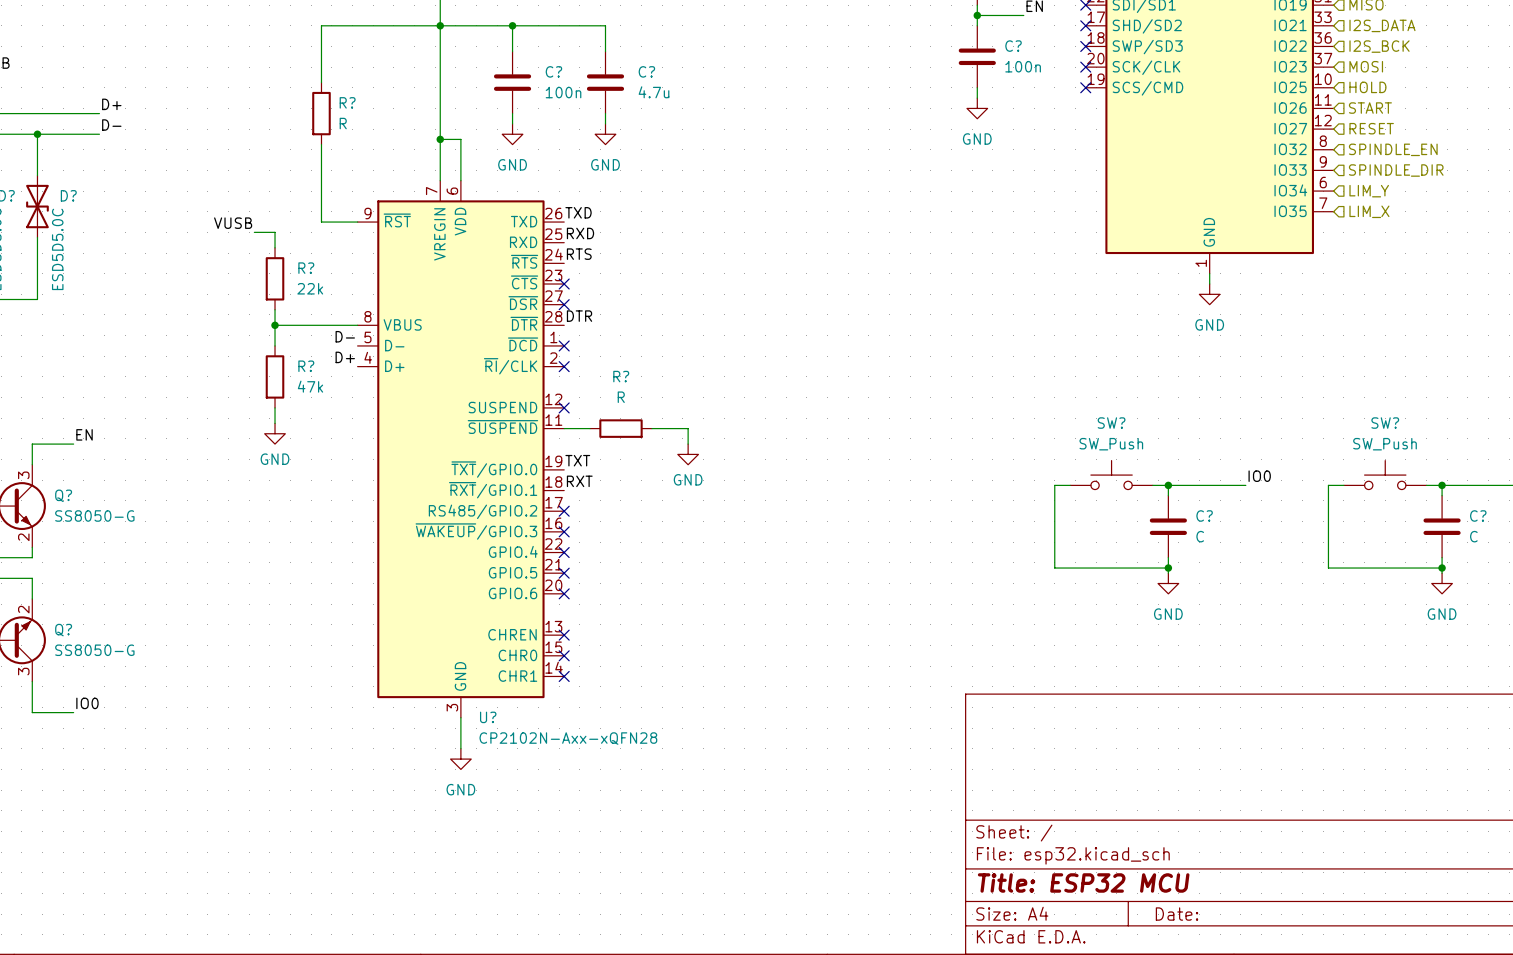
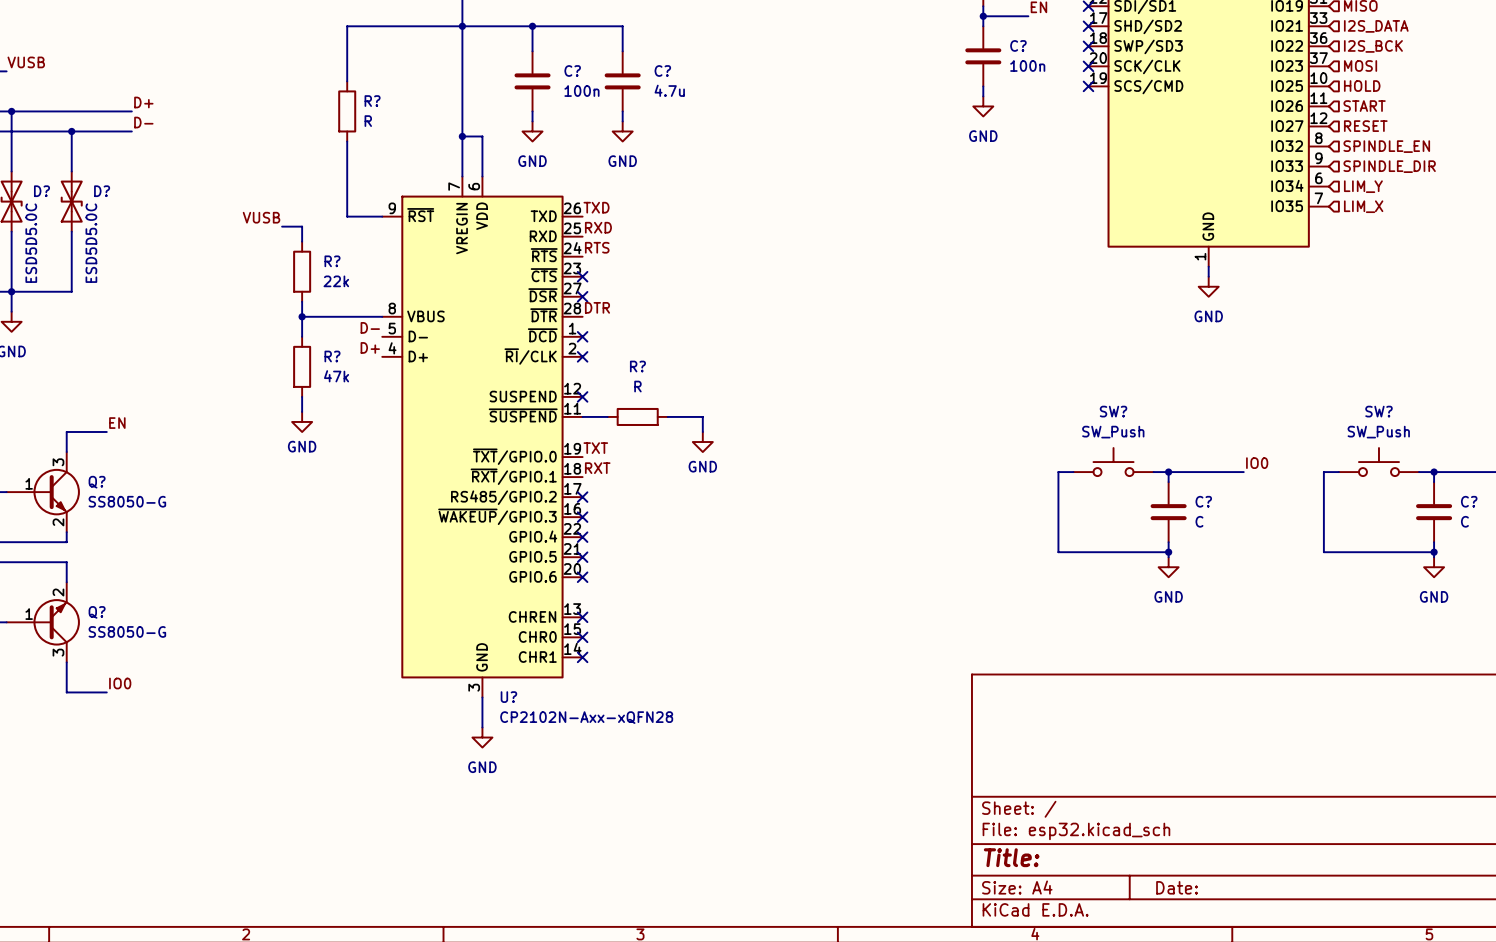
title block: Title: ESP32 MCU (1083, 882) -> Title: (1011, 857)

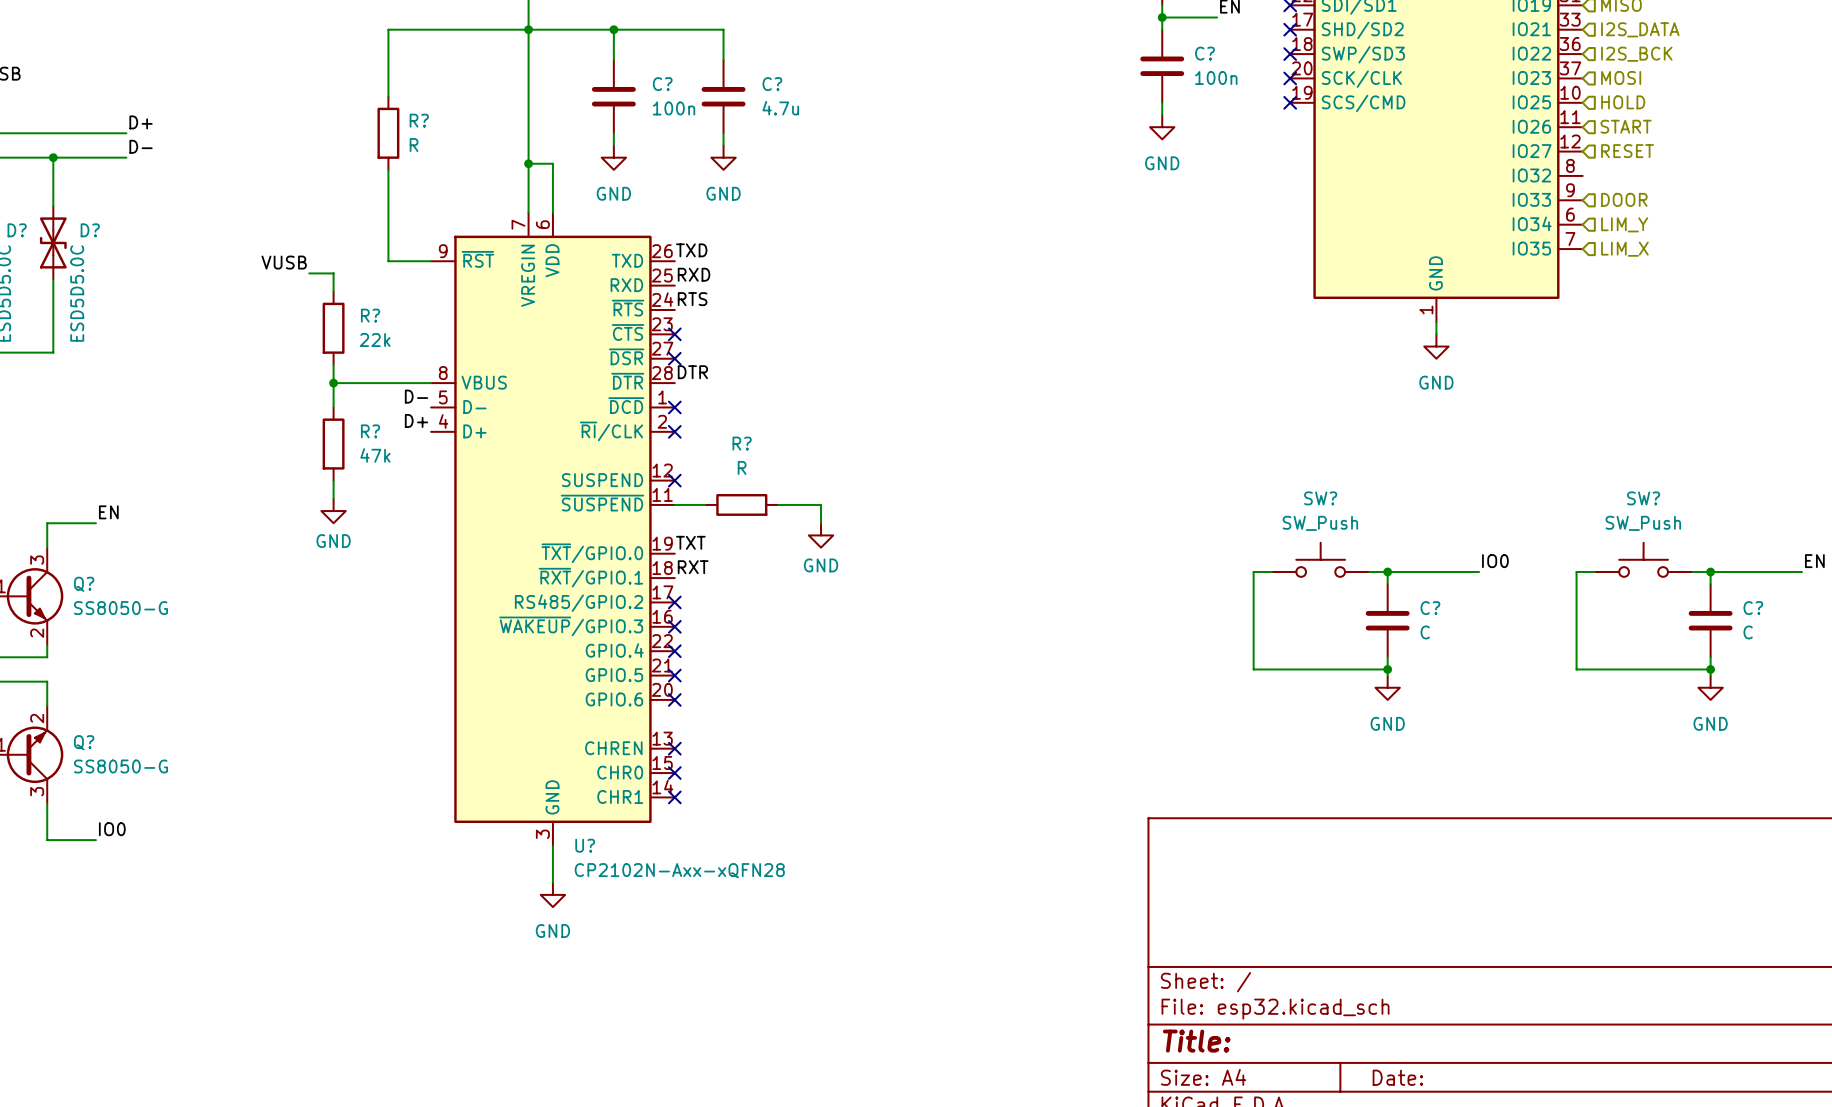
hierarchical label: SPINDLE_EN (1386, 146) -> none
hierarchical label: SPINDLE_DIR (1389, 166) -> DOOR (1624, 199)

